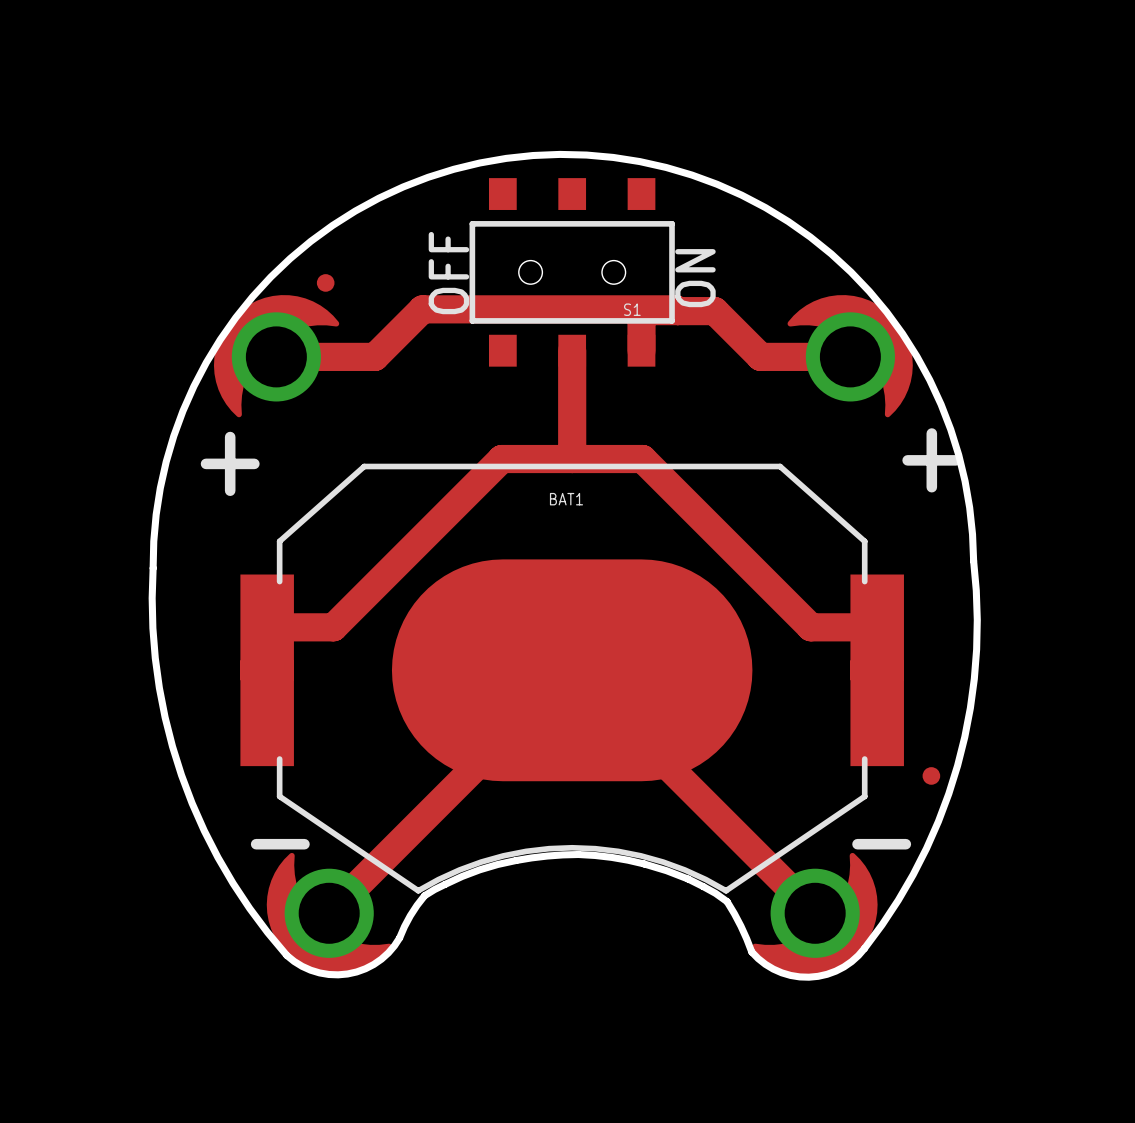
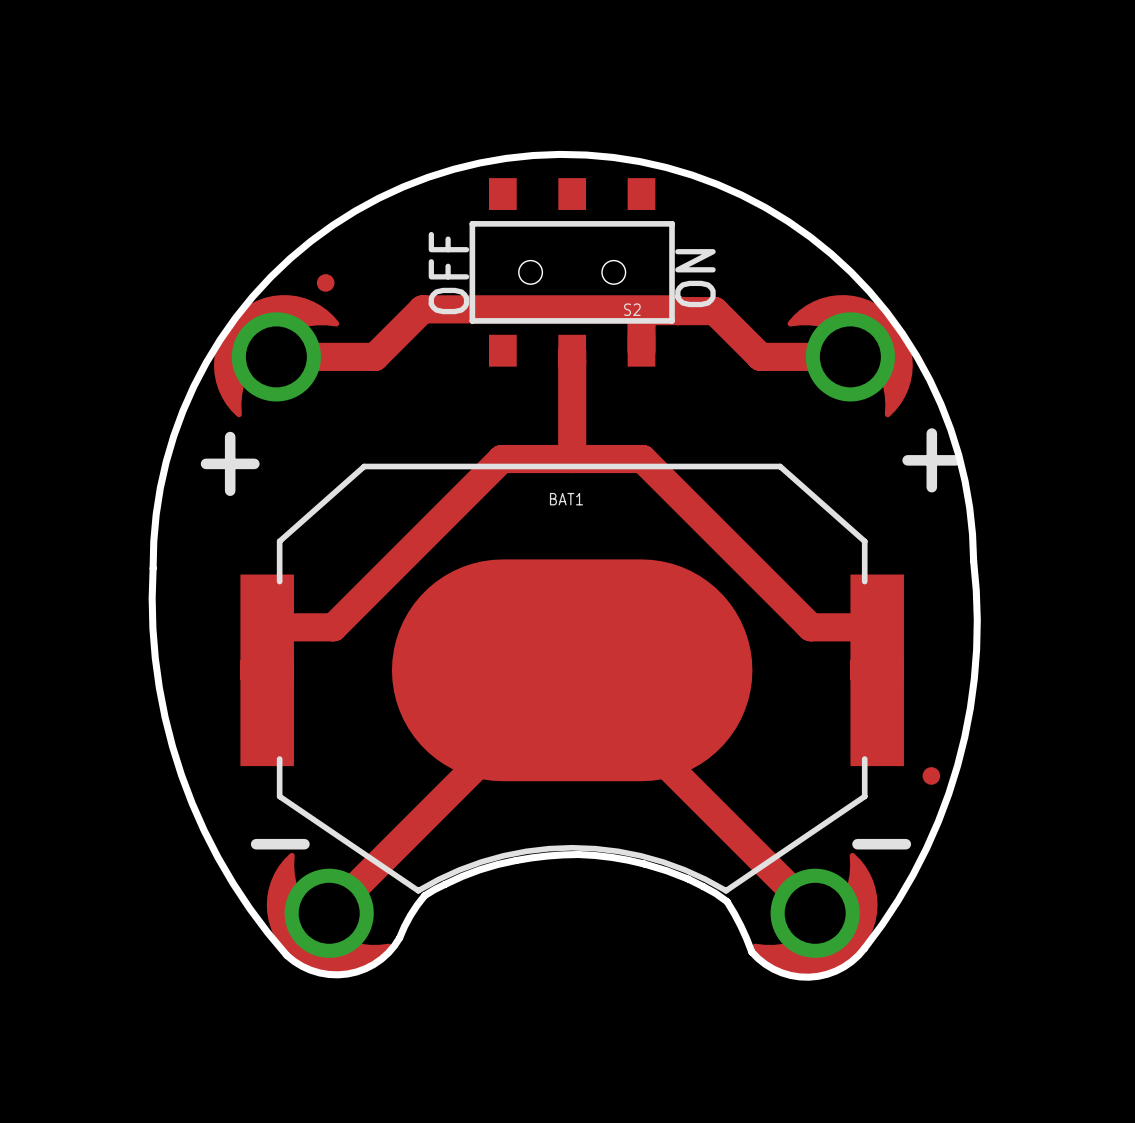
S1 name: S1 (632, 309) -> S2 (632, 309)

